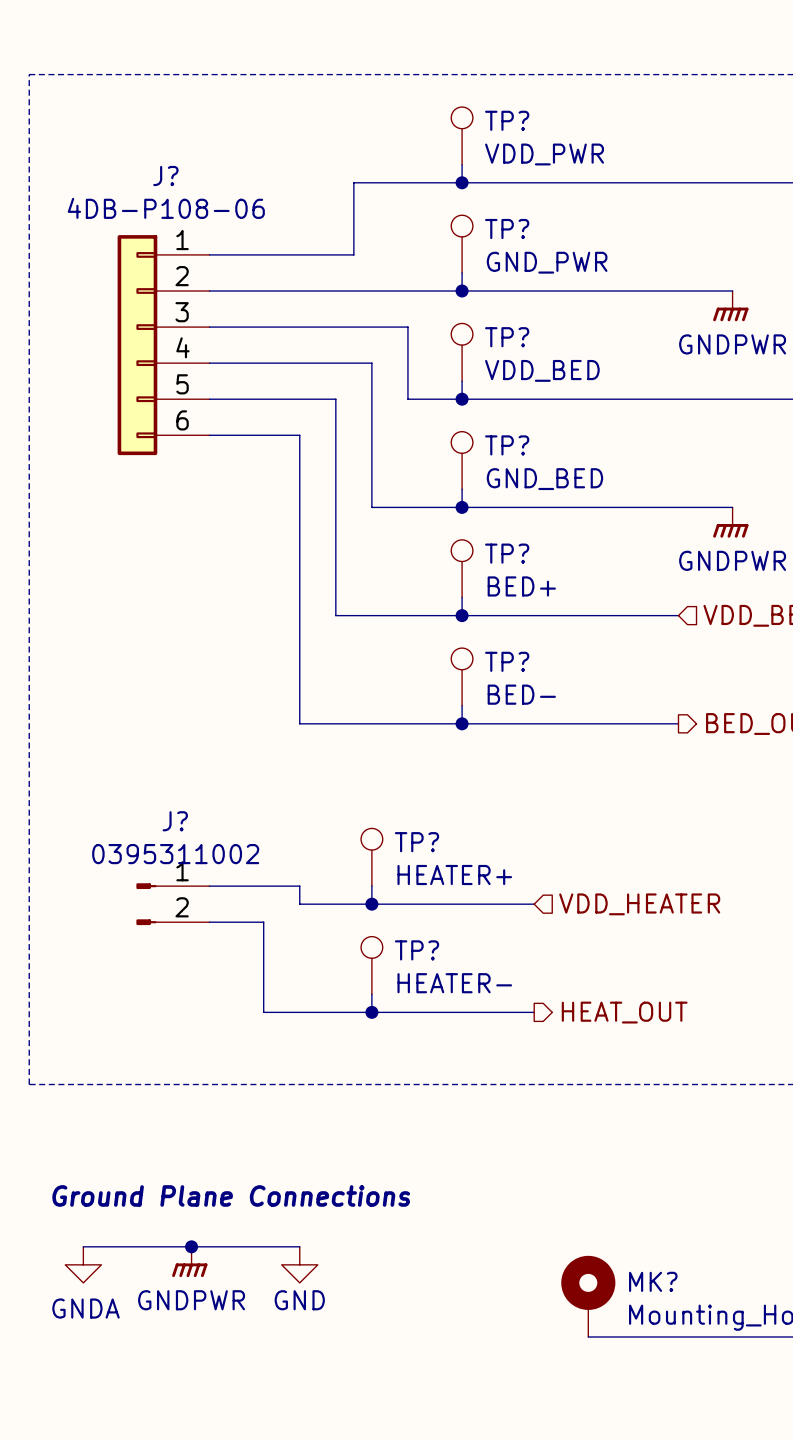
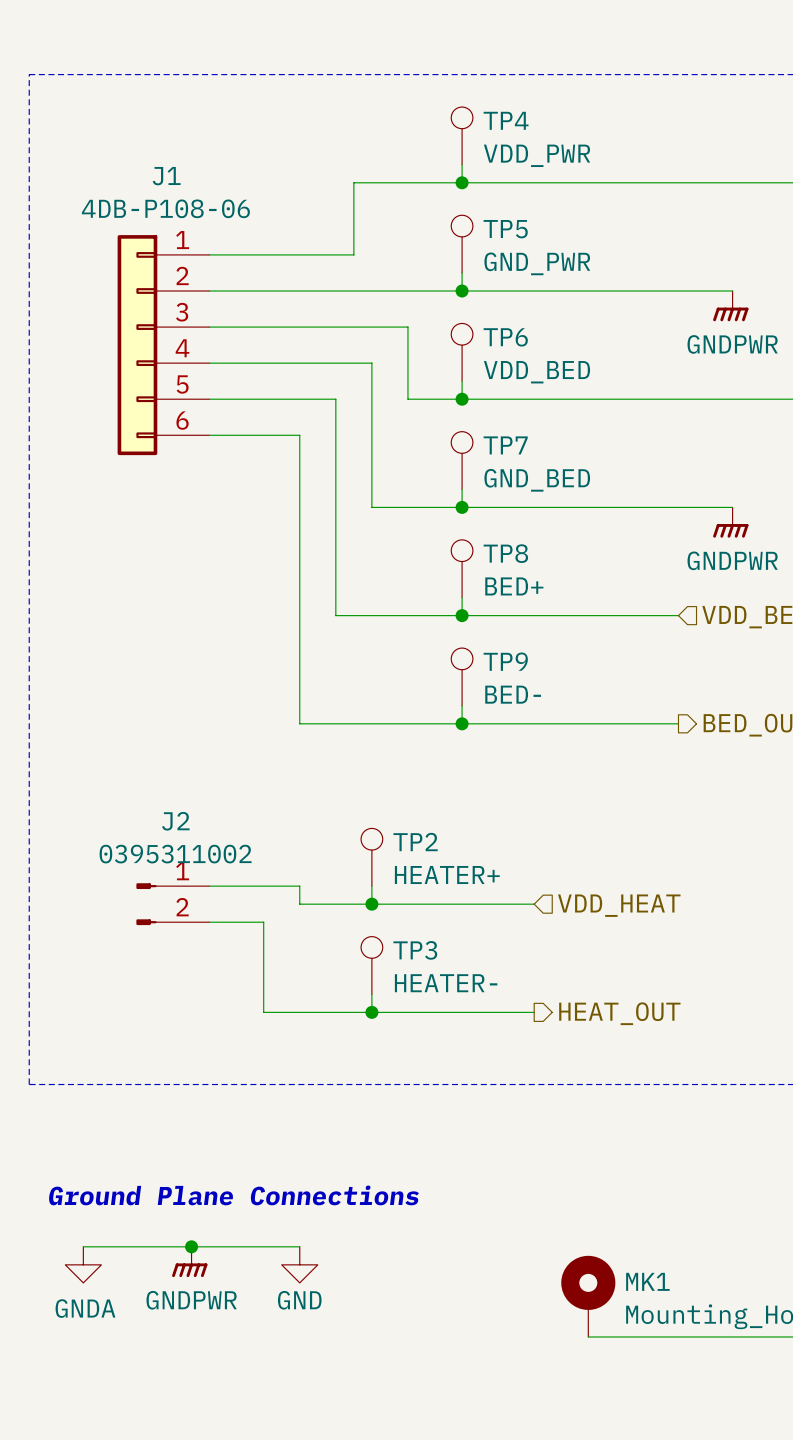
TP? name: TP? (507, 120) -> TP4 (506, 120)
J? name: J? (165, 175) -> J1 (166, 176)
TP? name: TP? (507, 229) -> TP5 (505, 229)
TP? name: TP? (507, 337) -> TP6 (505, 337)
TP? name: TP? (507, 445) -> TP7 (505, 445)
TP? name: TP? (507, 553) -> TP8 (505, 553)
TP? name: TP? (507, 661) -> TP9 (505, 661)
J? name: J? (175, 821) -> J2 (175, 821)
TP? name: TP? (417, 842) -> TP2 (415, 842)
hierarchical label: VDD_HEATER (639, 904) -> VDD_HEAT (619, 905)
TP? name: TP? (417, 950) -> TP3 (415, 950)
MK? name: MK? (653, 1281) -> MK1 (647, 1281)

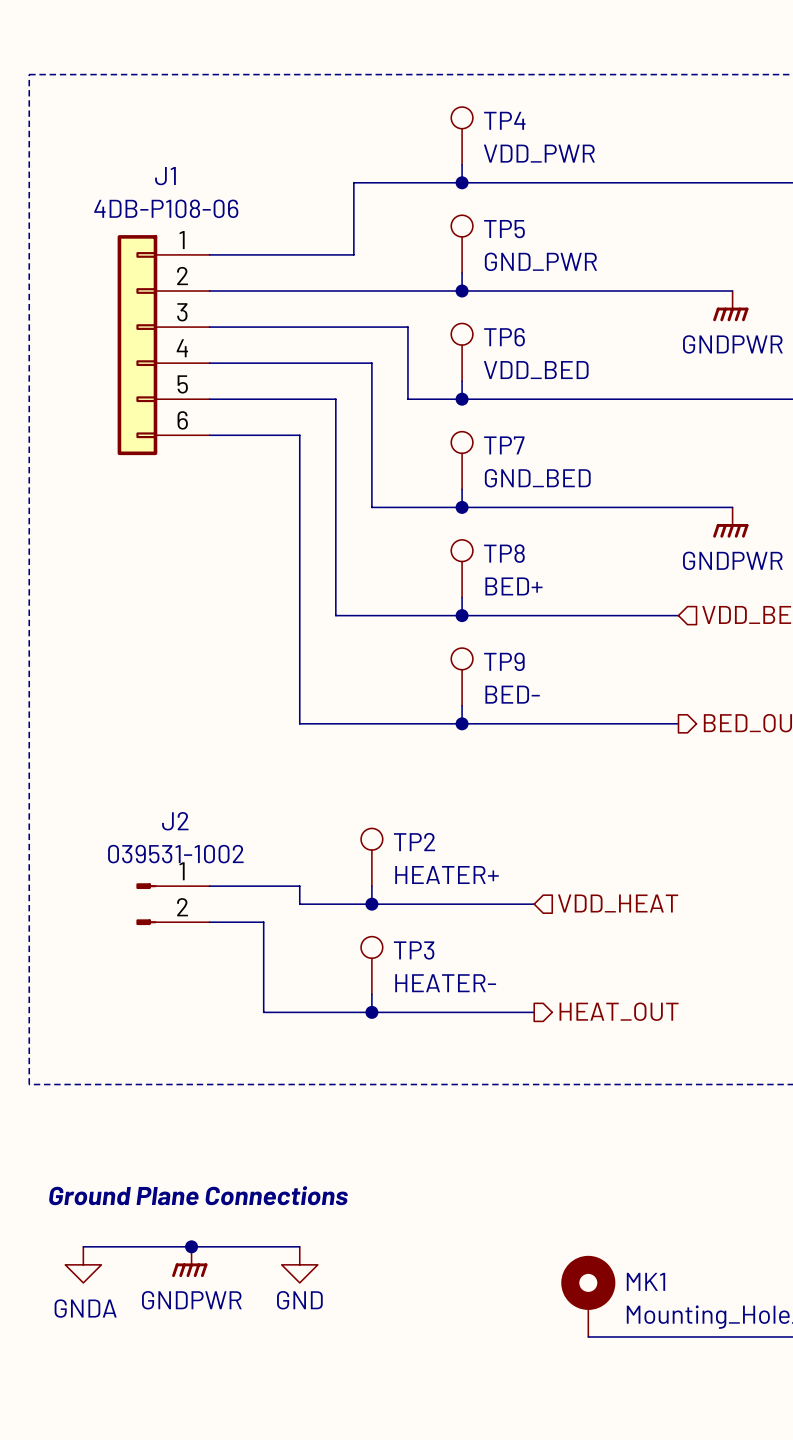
J2 value: 0395311002 (175, 854) -> 039531-1002 (175, 854)

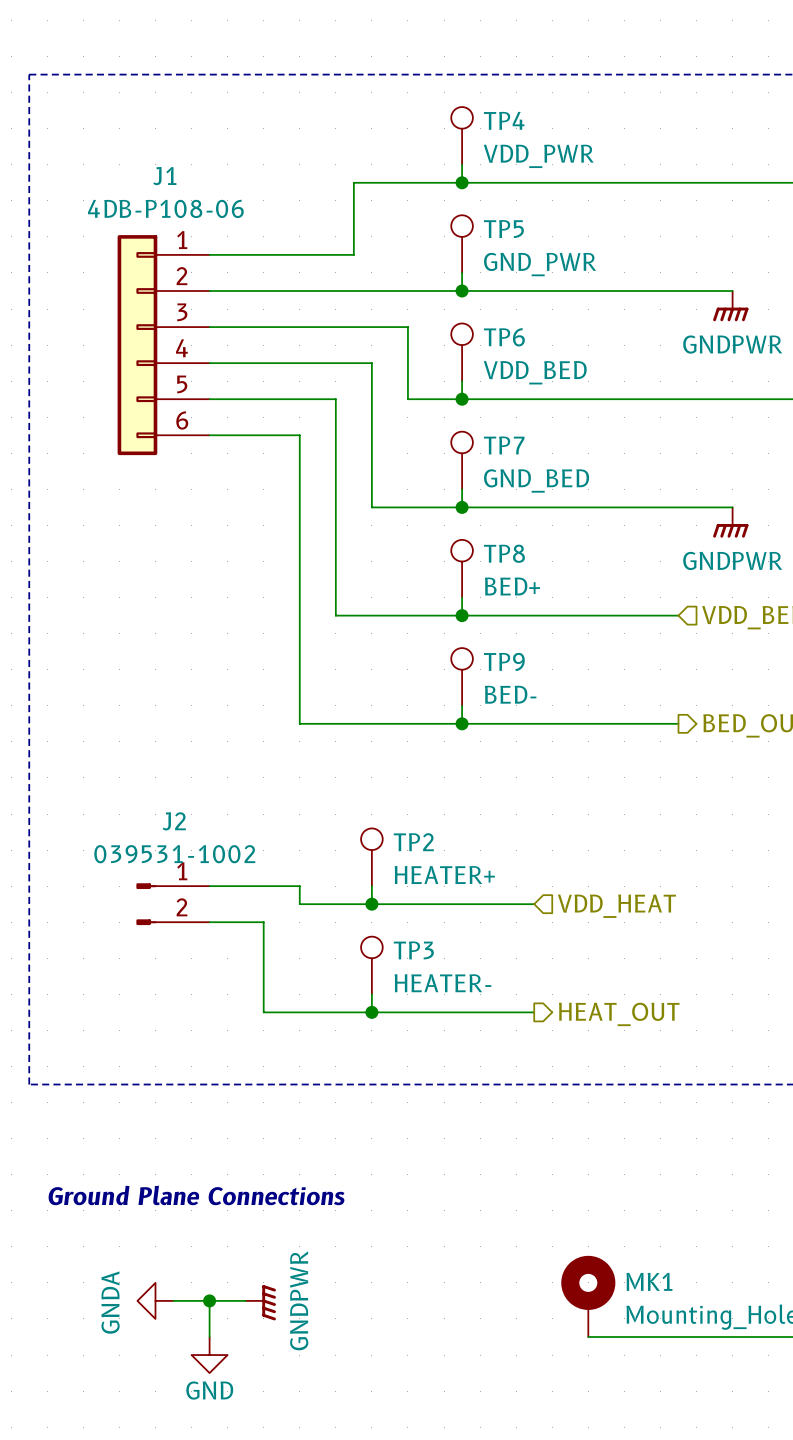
wire: (83, 1246) (299, 1246) -> none
junction position: (191, 1246) -> (209, 1300)
power symbol rotation: 0° (189, 1261) -> 90° counterclockwise (260, 1302)
power symbol position: GNDPWR (189, 1261) -> GNDPWR (260, 1302)
power symbol rotation: 0° (83, 1264) -> 90° clockwise (155, 1300)
power symbol position: GNDA (83, 1264) -> GNDA (155, 1300)
power symbol position: GND (299, 1264) -> GND (209, 1355)
wire: none -> (173, 1300) (245, 1300)
wire: none -> (209, 1300) (209, 1336)

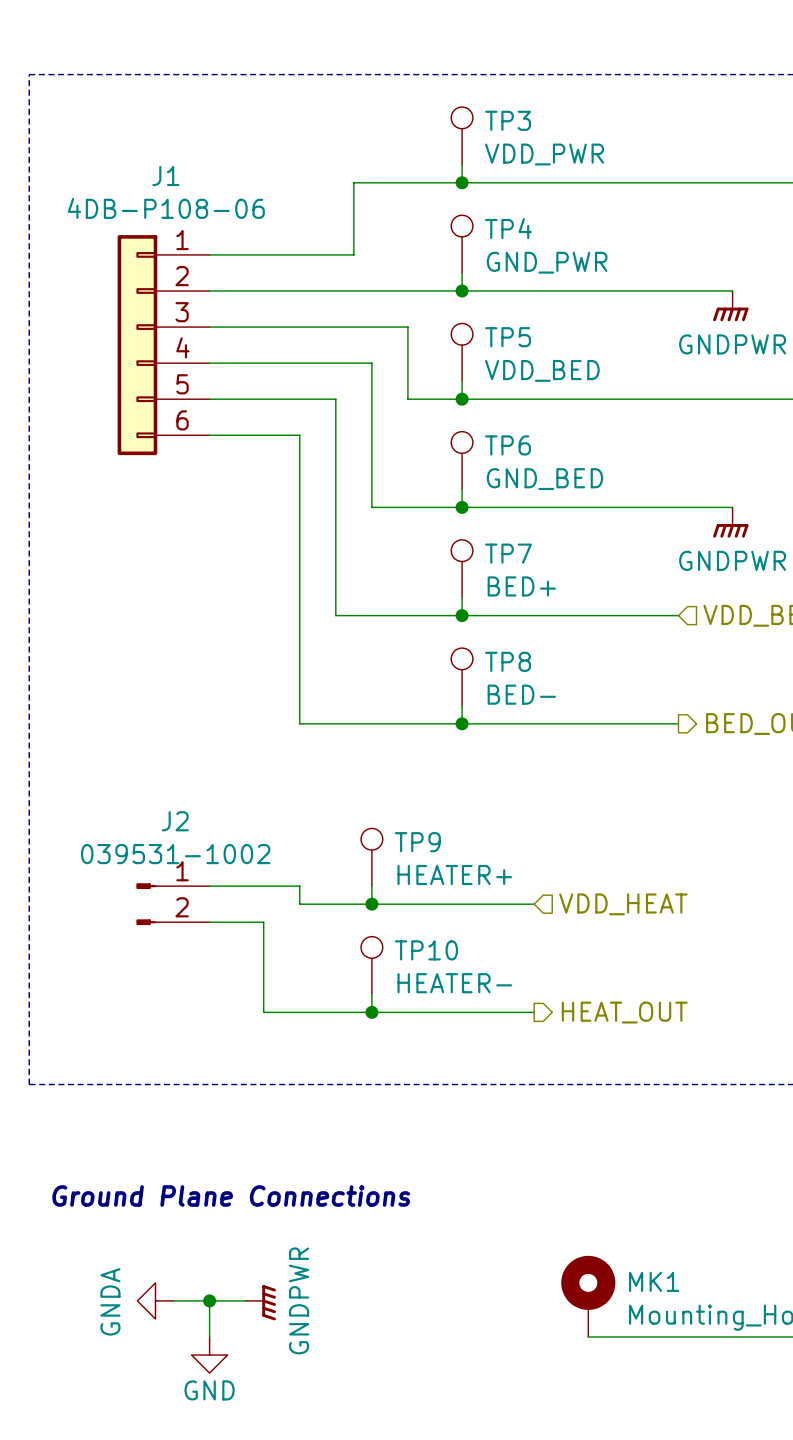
TP4 name: TP4 (504, 120) -> TP3 (508, 120)
TP5 name: TP5 (503, 229) -> TP4 (508, 228)
TP6 name: TP6 (504, 337) -> TP5 (508, 337)
TP7 name: TP7 (504, 445) -> TP6 (508, 445)
TP8 name: TP8 (504, 553) -> TP7 (508, 553)
TP9 name: TP9 (504, 661) -> TP8 (508, 661)
TP2 name: TP2 (413, 842) -> TP9 (417, 842)
TP3 name: TP3 (413, 950) -> TP10 (426, 950)

